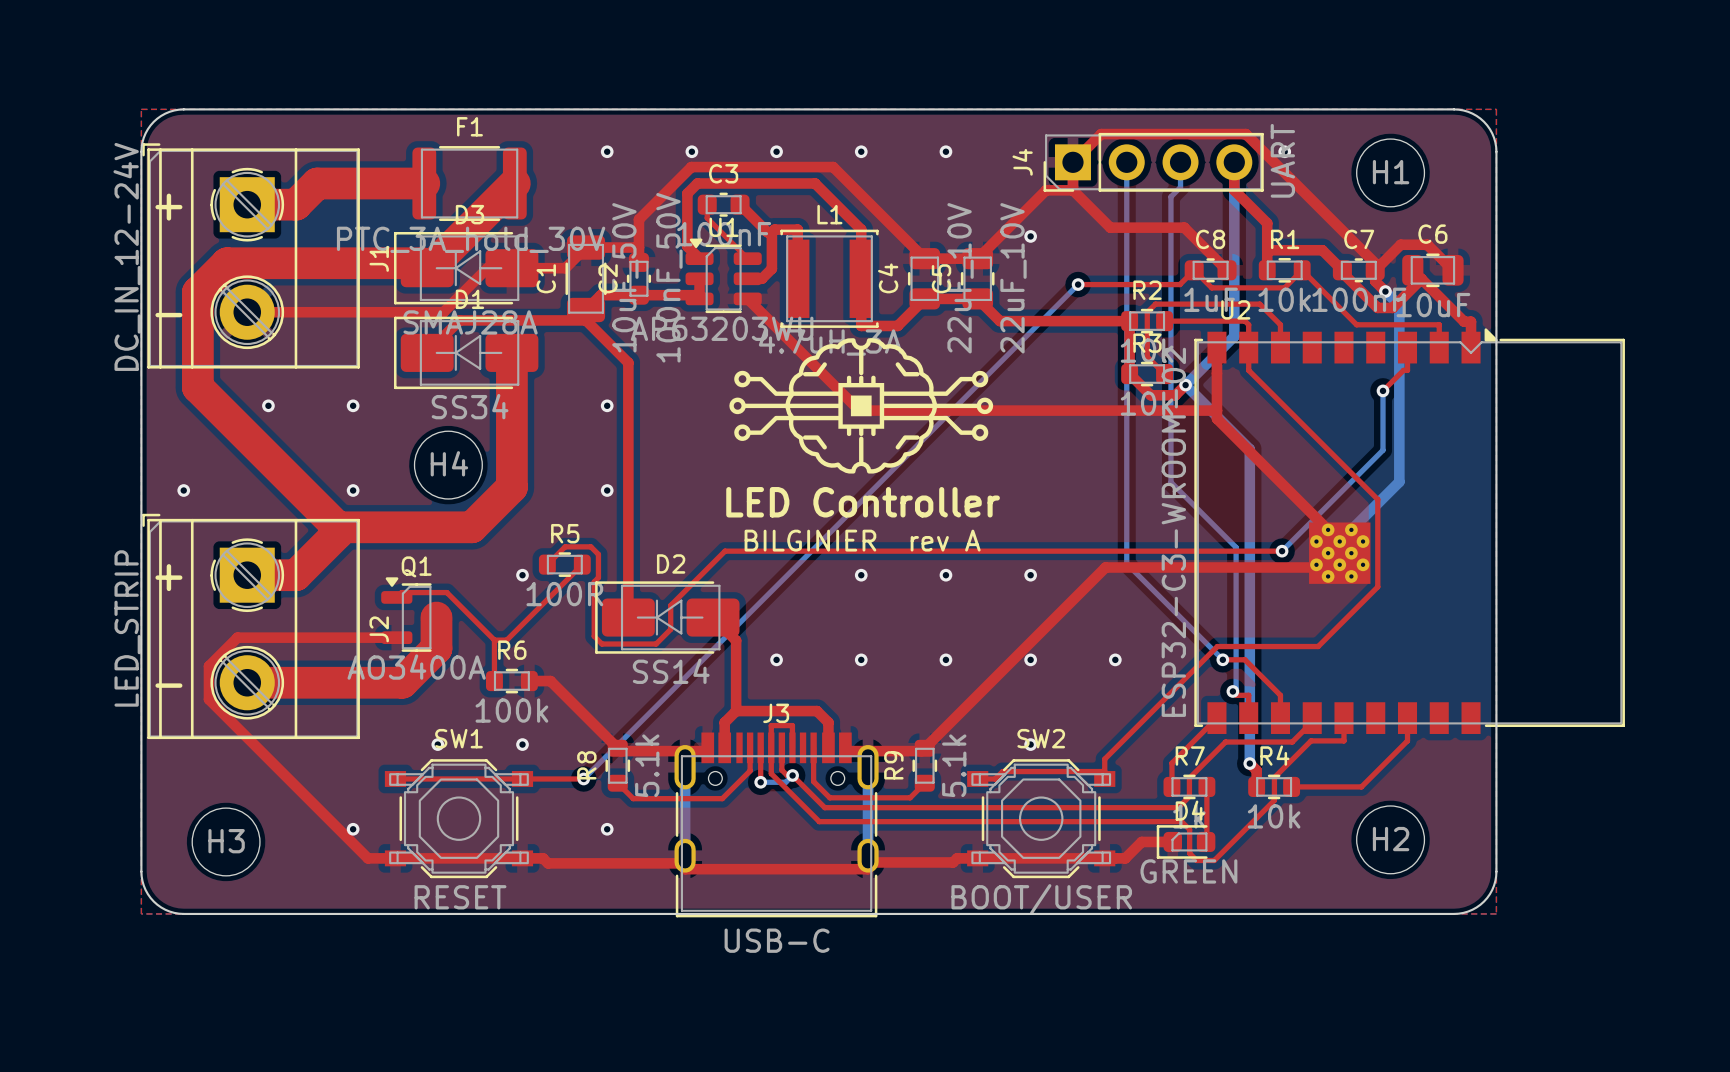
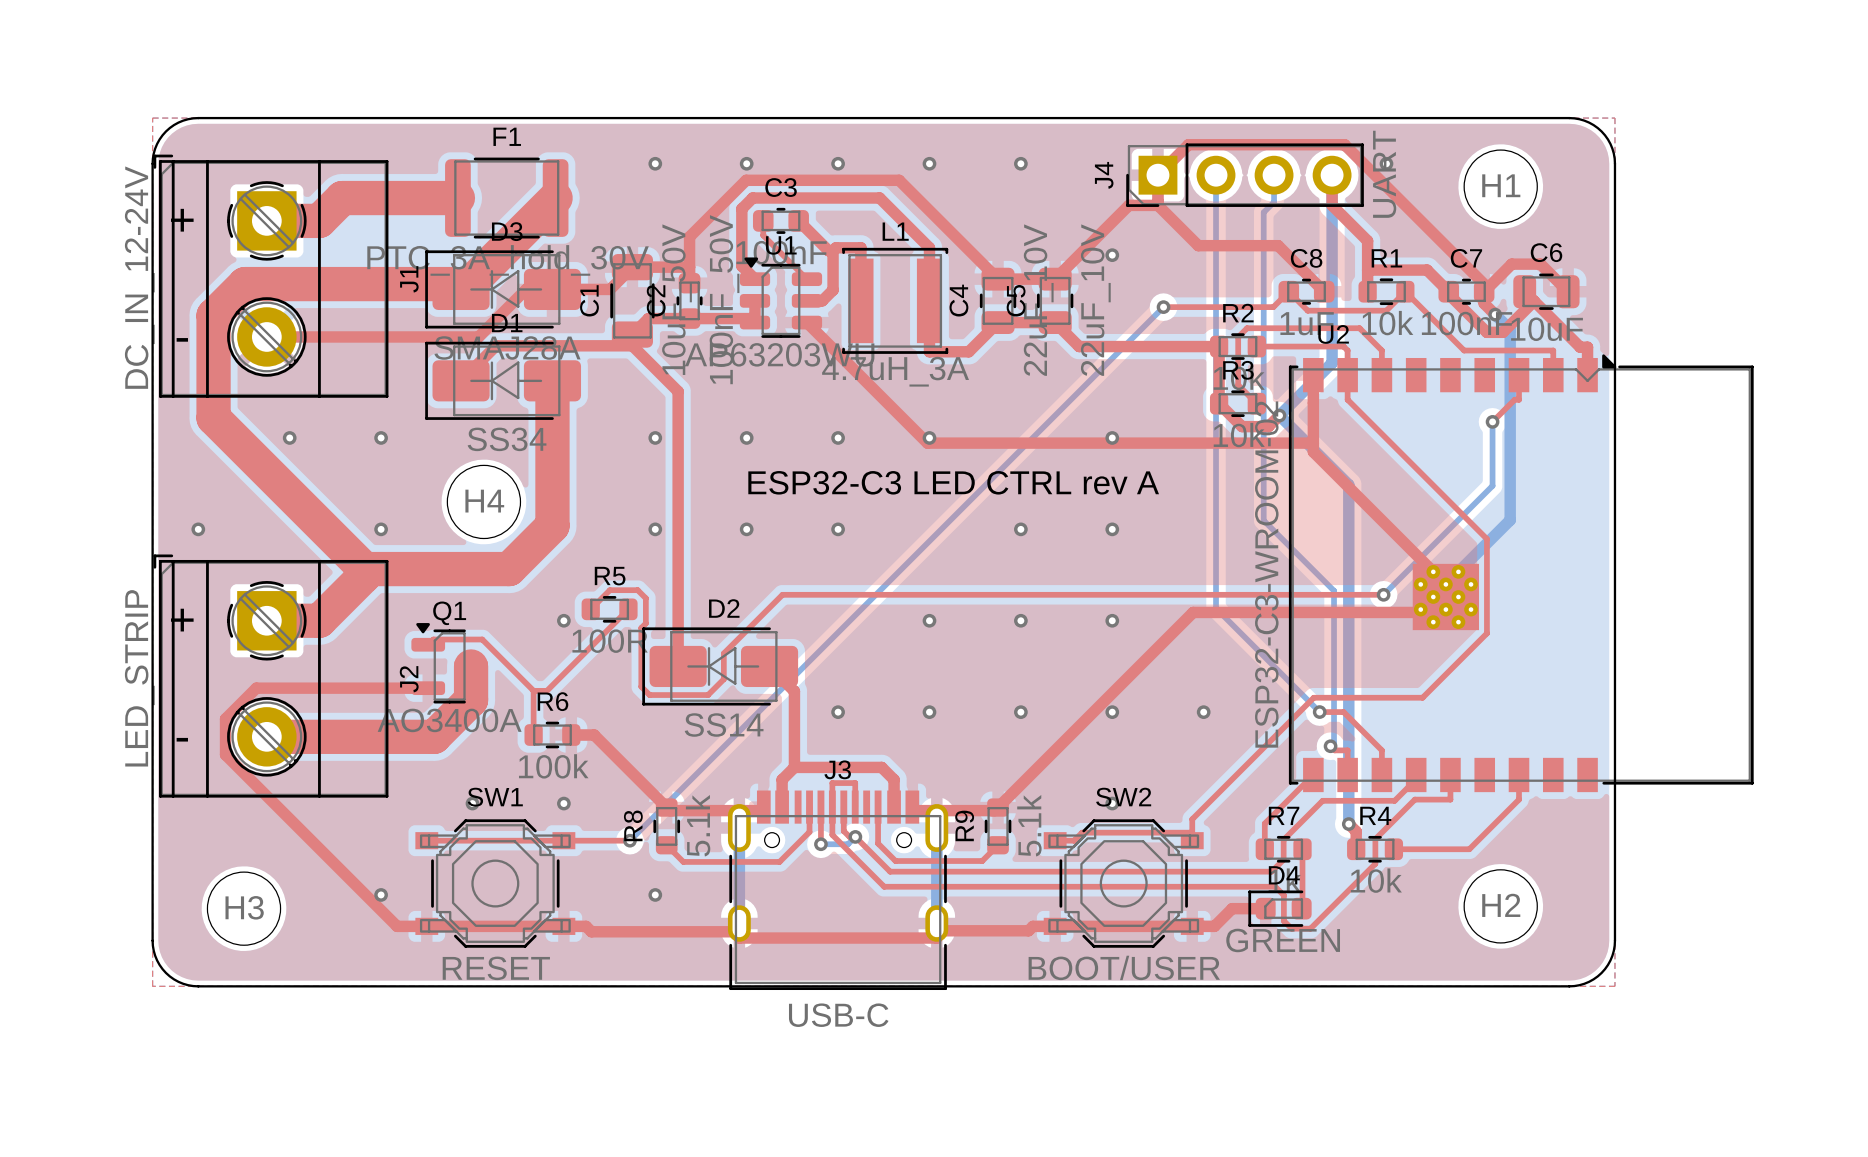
drawing: [729, 338, 994, 474] -> none
via: none -> (746, 437)
via: none -> (838, 437)
via: none -> (929, 437)
via: none -> (1112, 437)
text: none -> ESP32-C3 LED CTRL rev A (953, 482)
via: none -> (746, 529)
via: none -> (838, 529)
via: none -> (1020, 529)
via: none -> (1112, 529)
text: LED Controller (863, 502) -> none
text: BILGINIER rev A (862, 540) -> none

